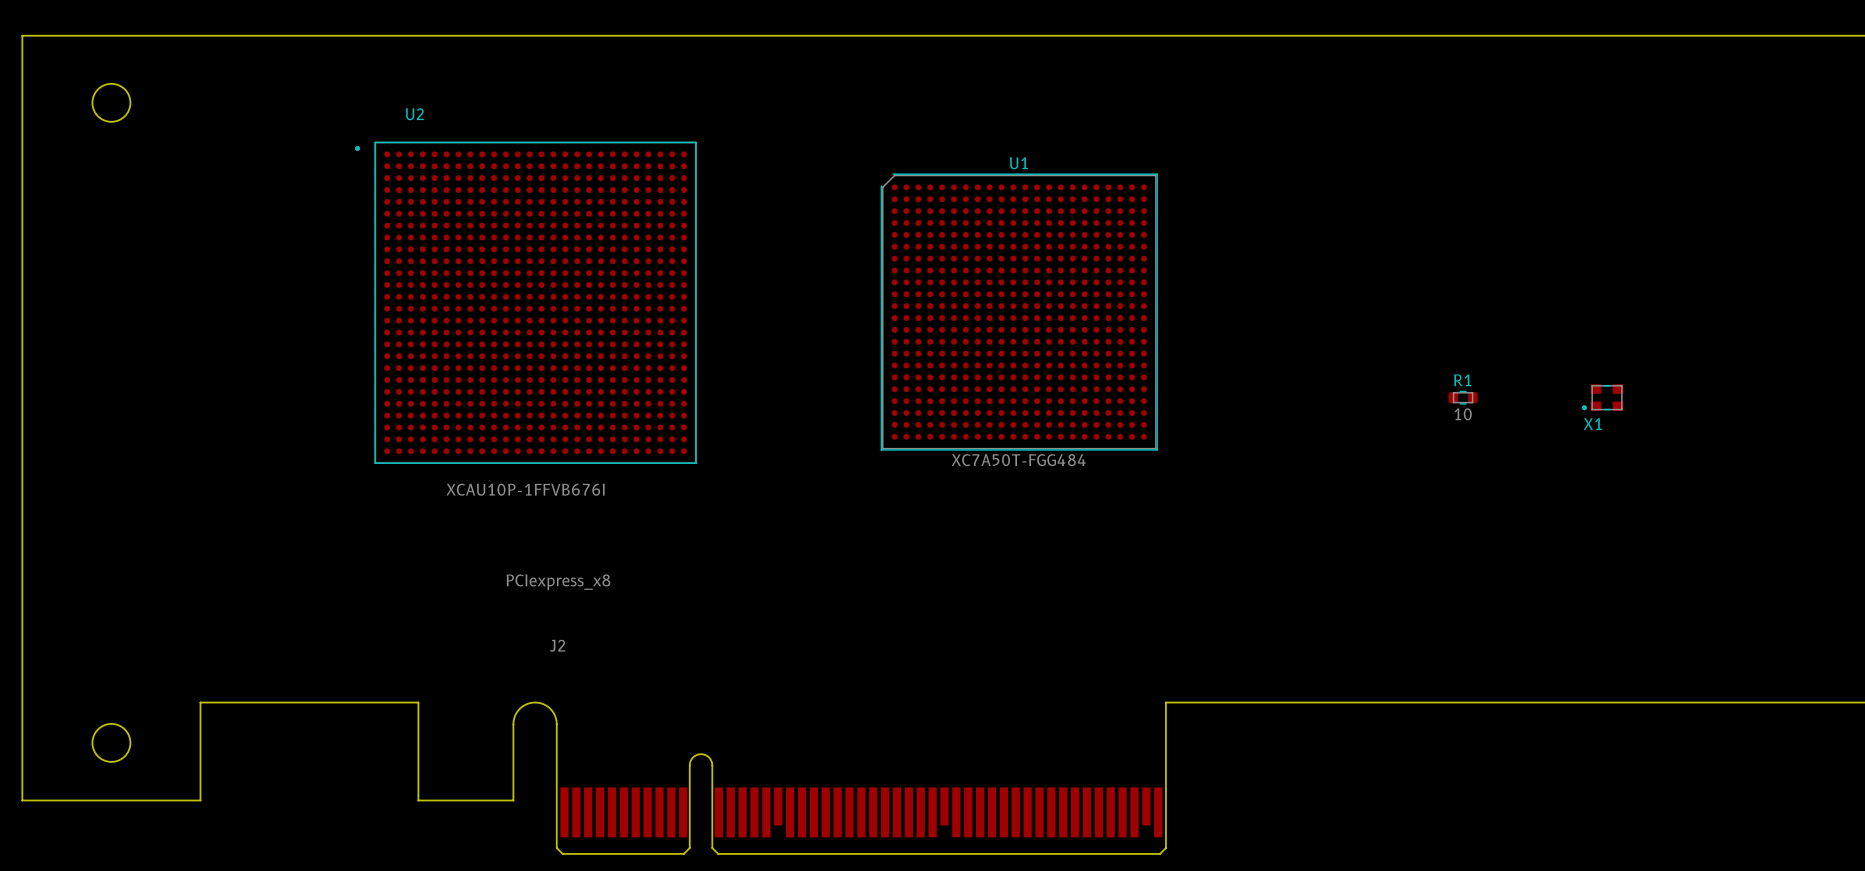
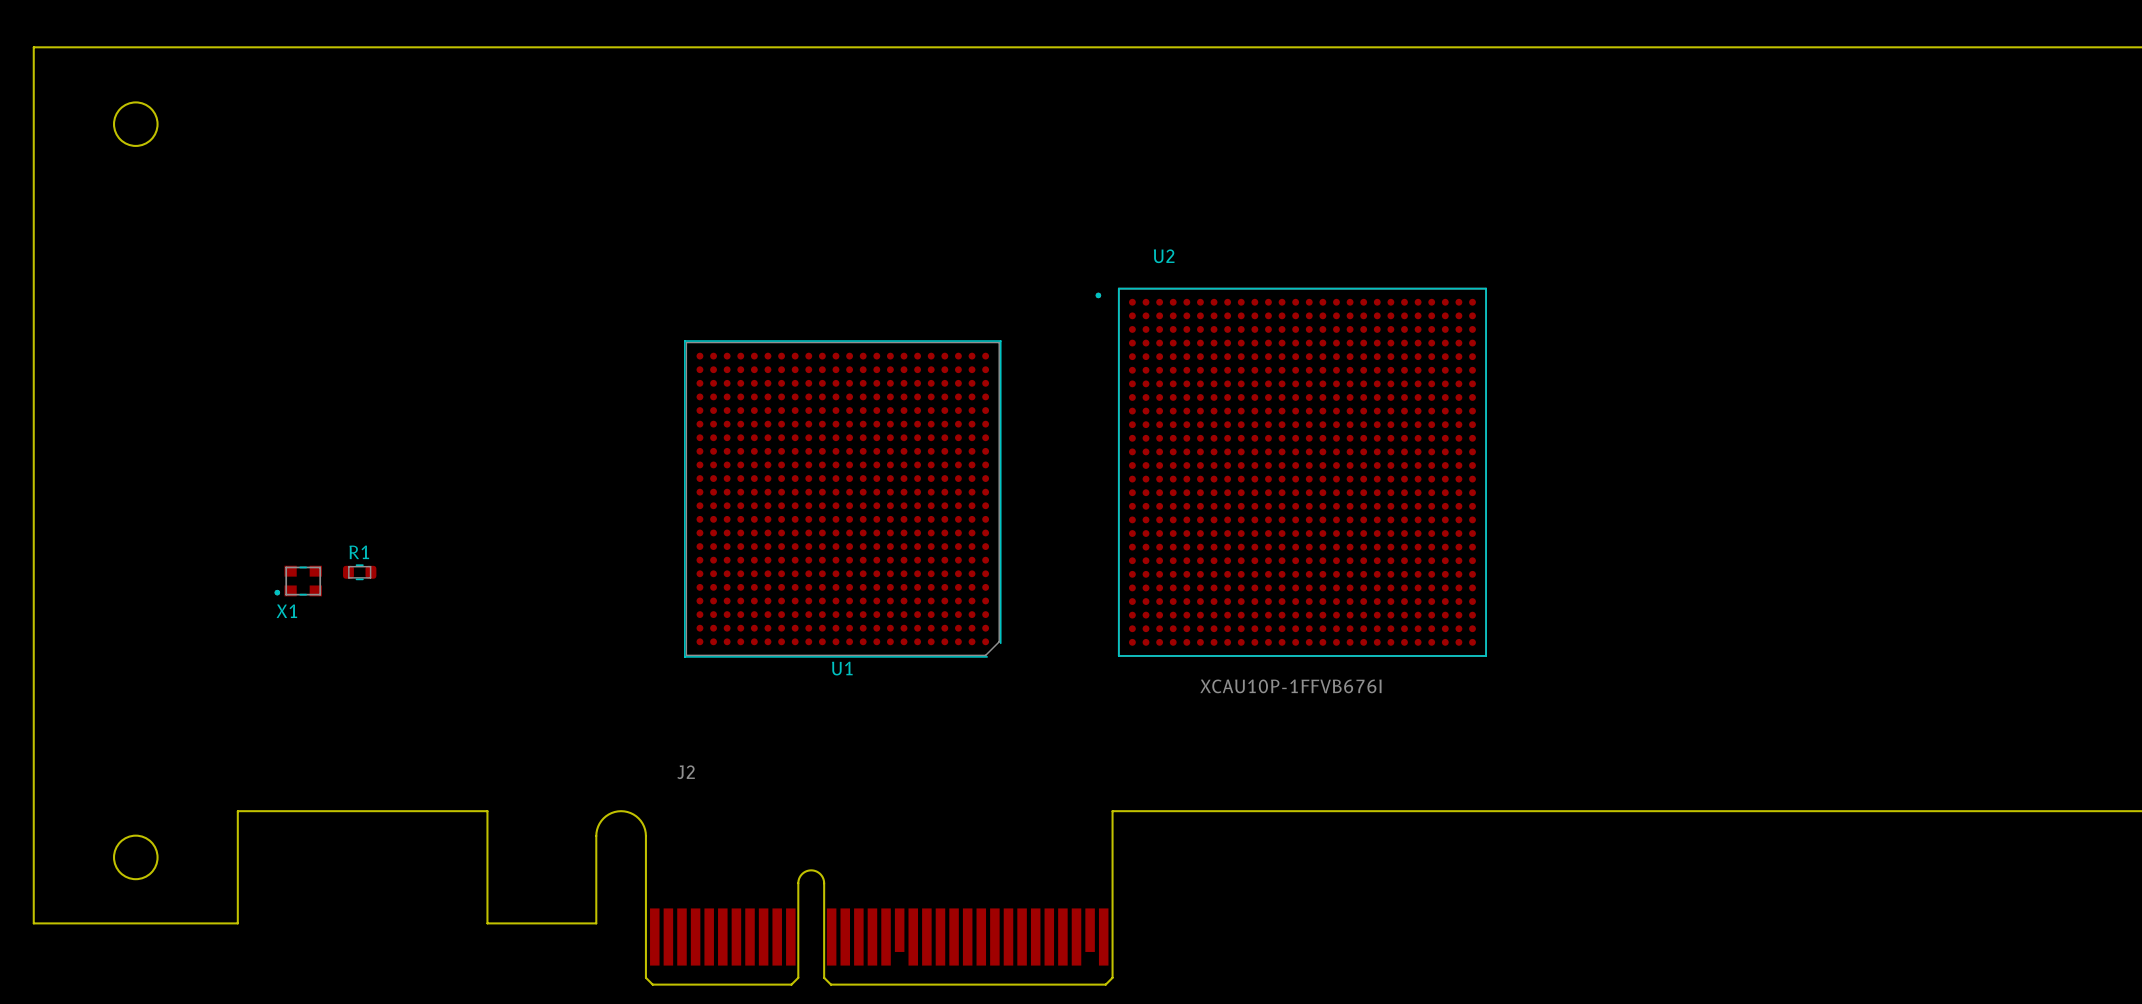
U2 position: (525, 302) -> (1291, 472)
U1 rotation: 0° (1019, 312) -> 180° (842, 498)
U1 position: (1019, 312) -> (842, 498)
R1 position: (1463, 397) -> (359, 572)
X1 position: (1602, 397) -> (298, 581)
R1 value: 10 (1463, 414) -> none
U1 value: XC7A50T-FGG484 (1018, 460) -> none
J2 value: PCIexpress_x8 (558, 582) -> none
J2 name position: J2 (557, 645) -> J2 (686, 772)
board edge: (1165, 702) (1165, 848) (1160, 853) (958, 853) -> (1343, 811) (1112, 811) (1112, 977) (1105, 984)
J2 footprint: [560, 787, 1163, 838] -> [650, 908, 1109, 966]

